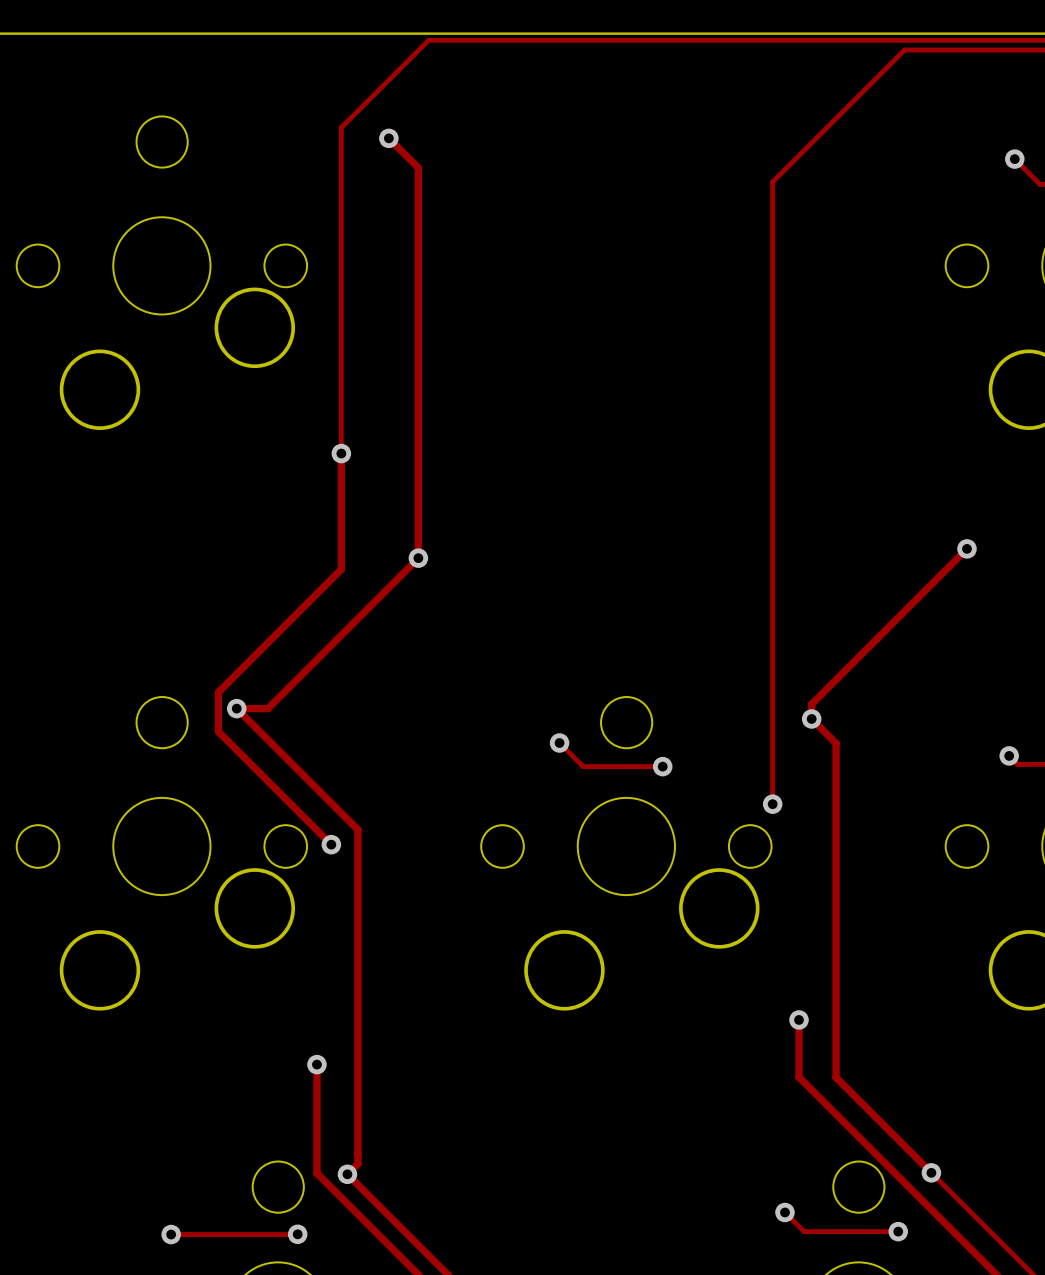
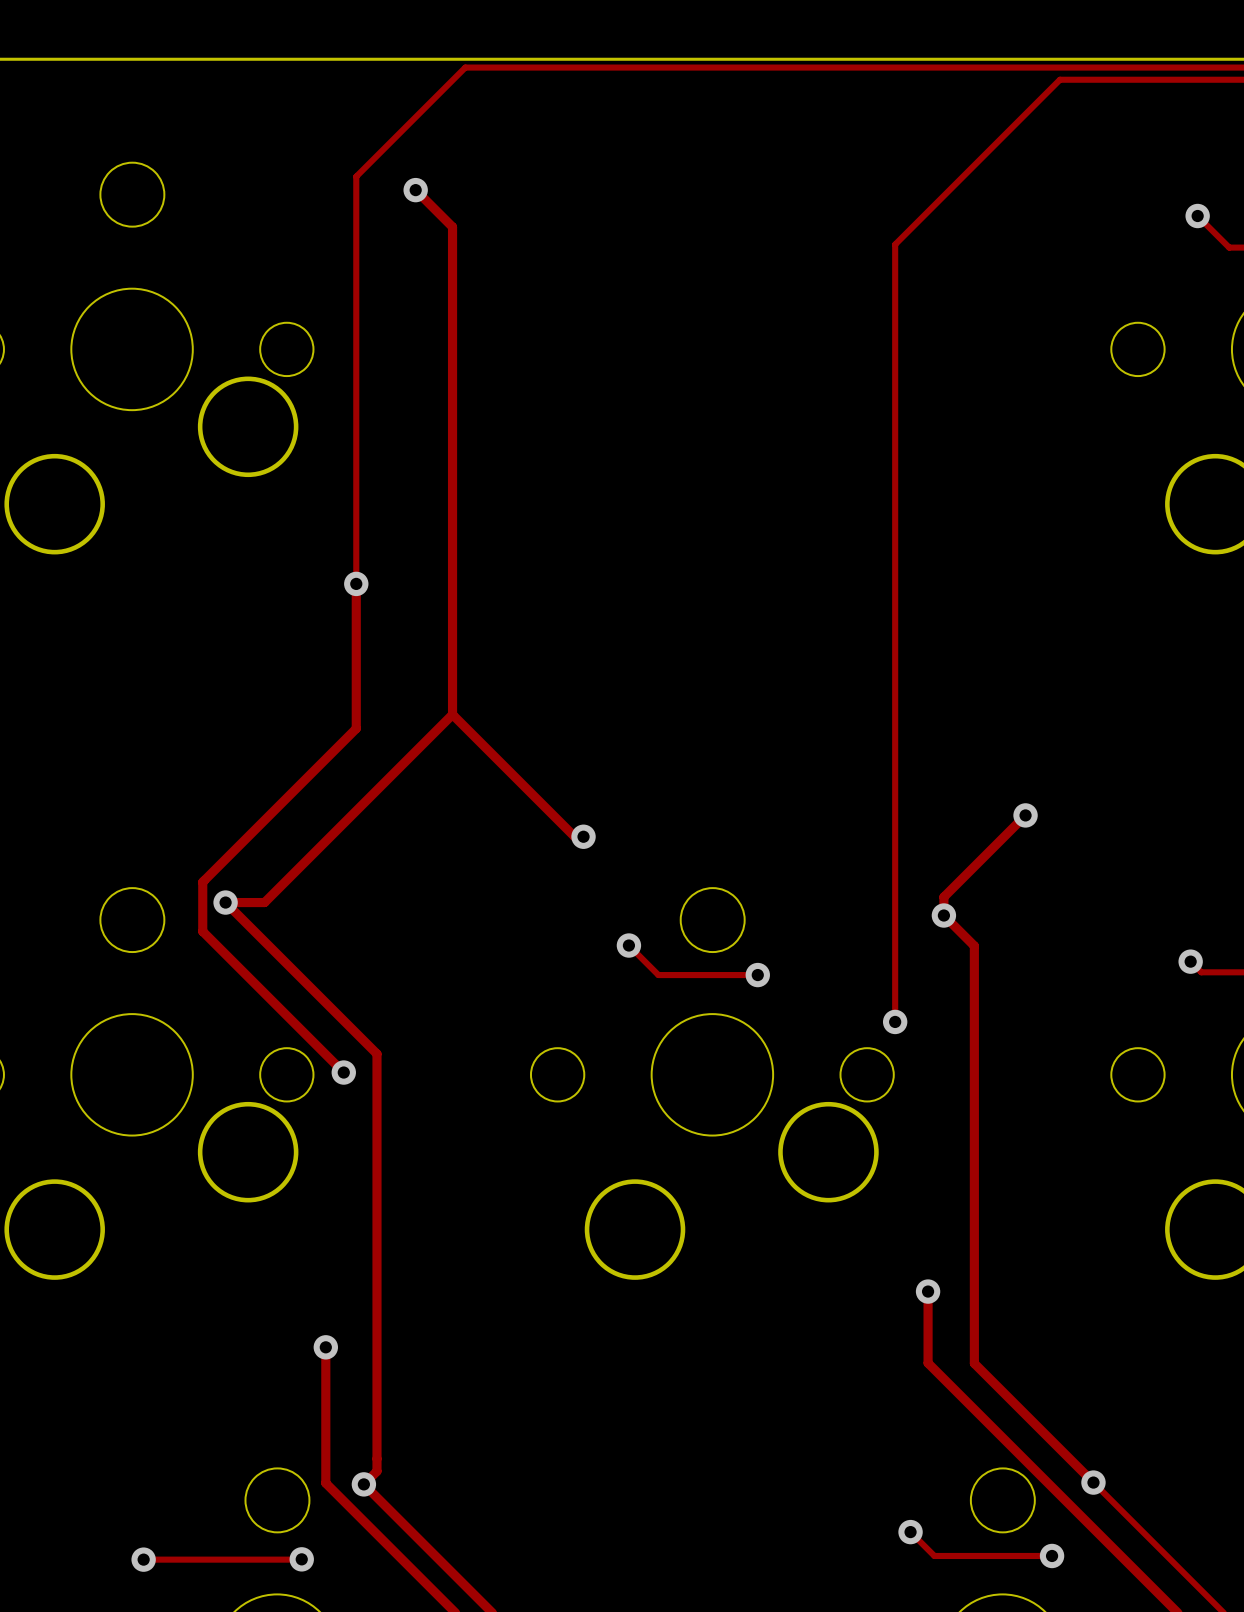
track: (967, 548) (877, 638) -> none
via position: (967, 548) -> (1025, 815)
track: none -> (452, 714) (574, 836) (583, 836)
via position: (418, 558) -> (583, 836)

